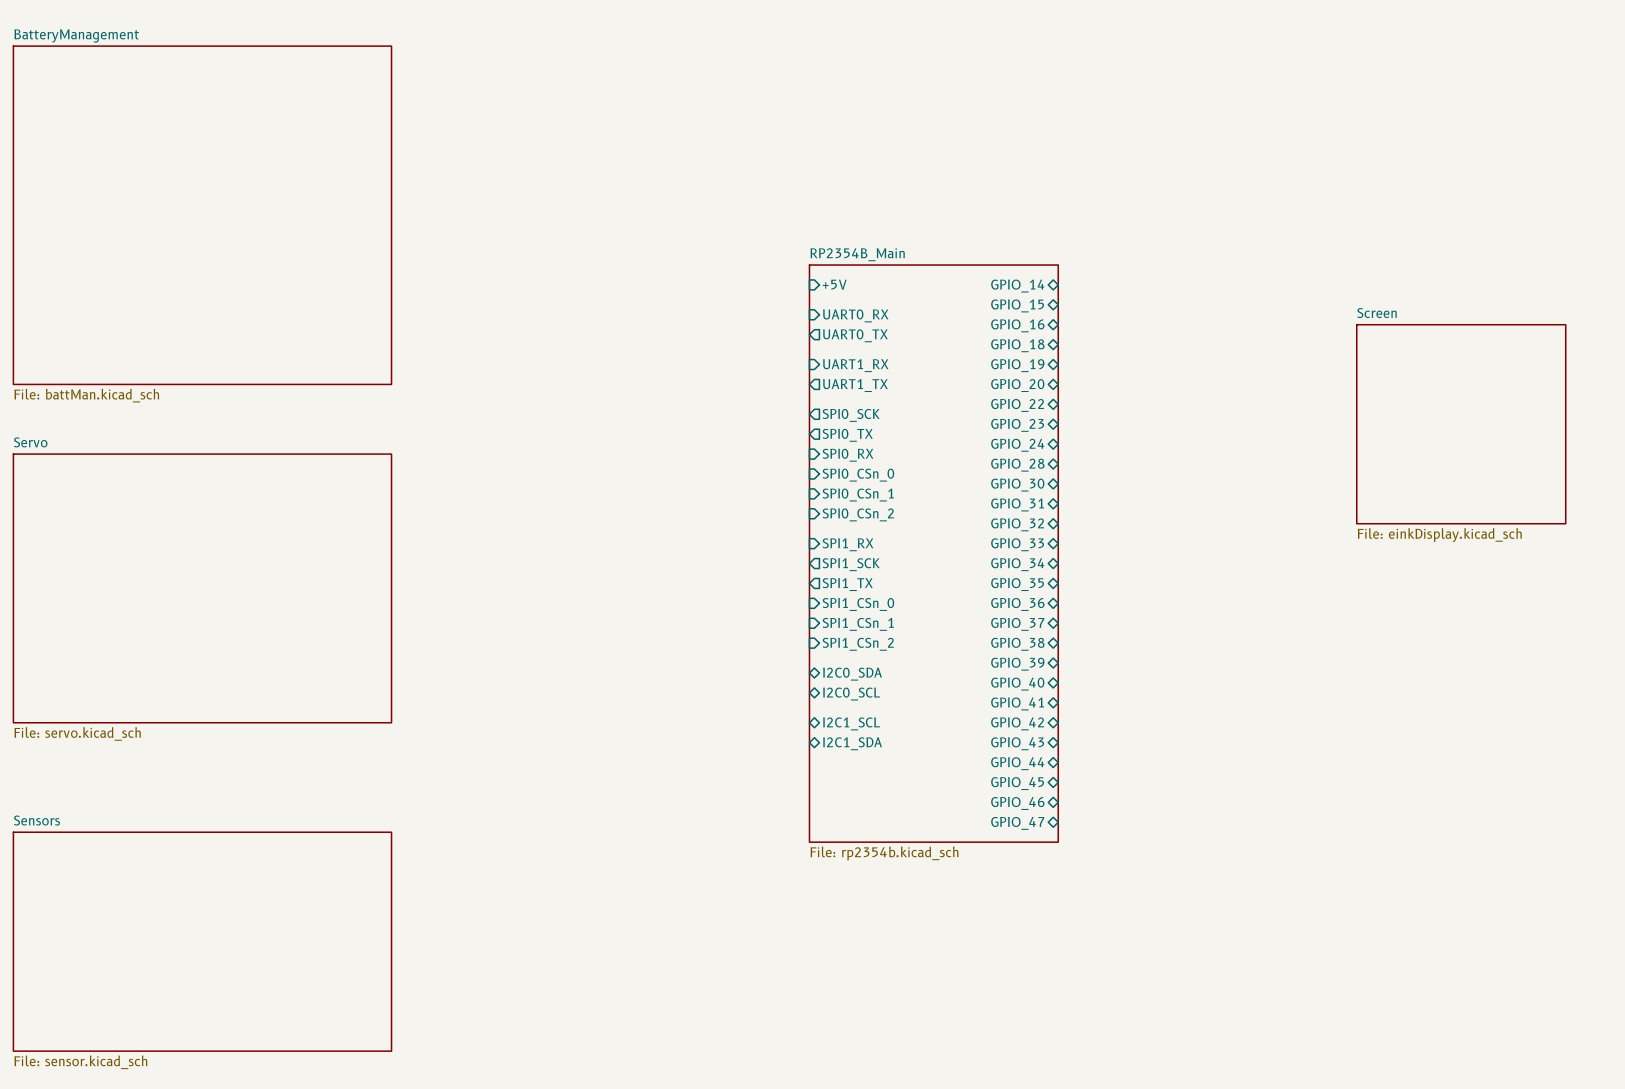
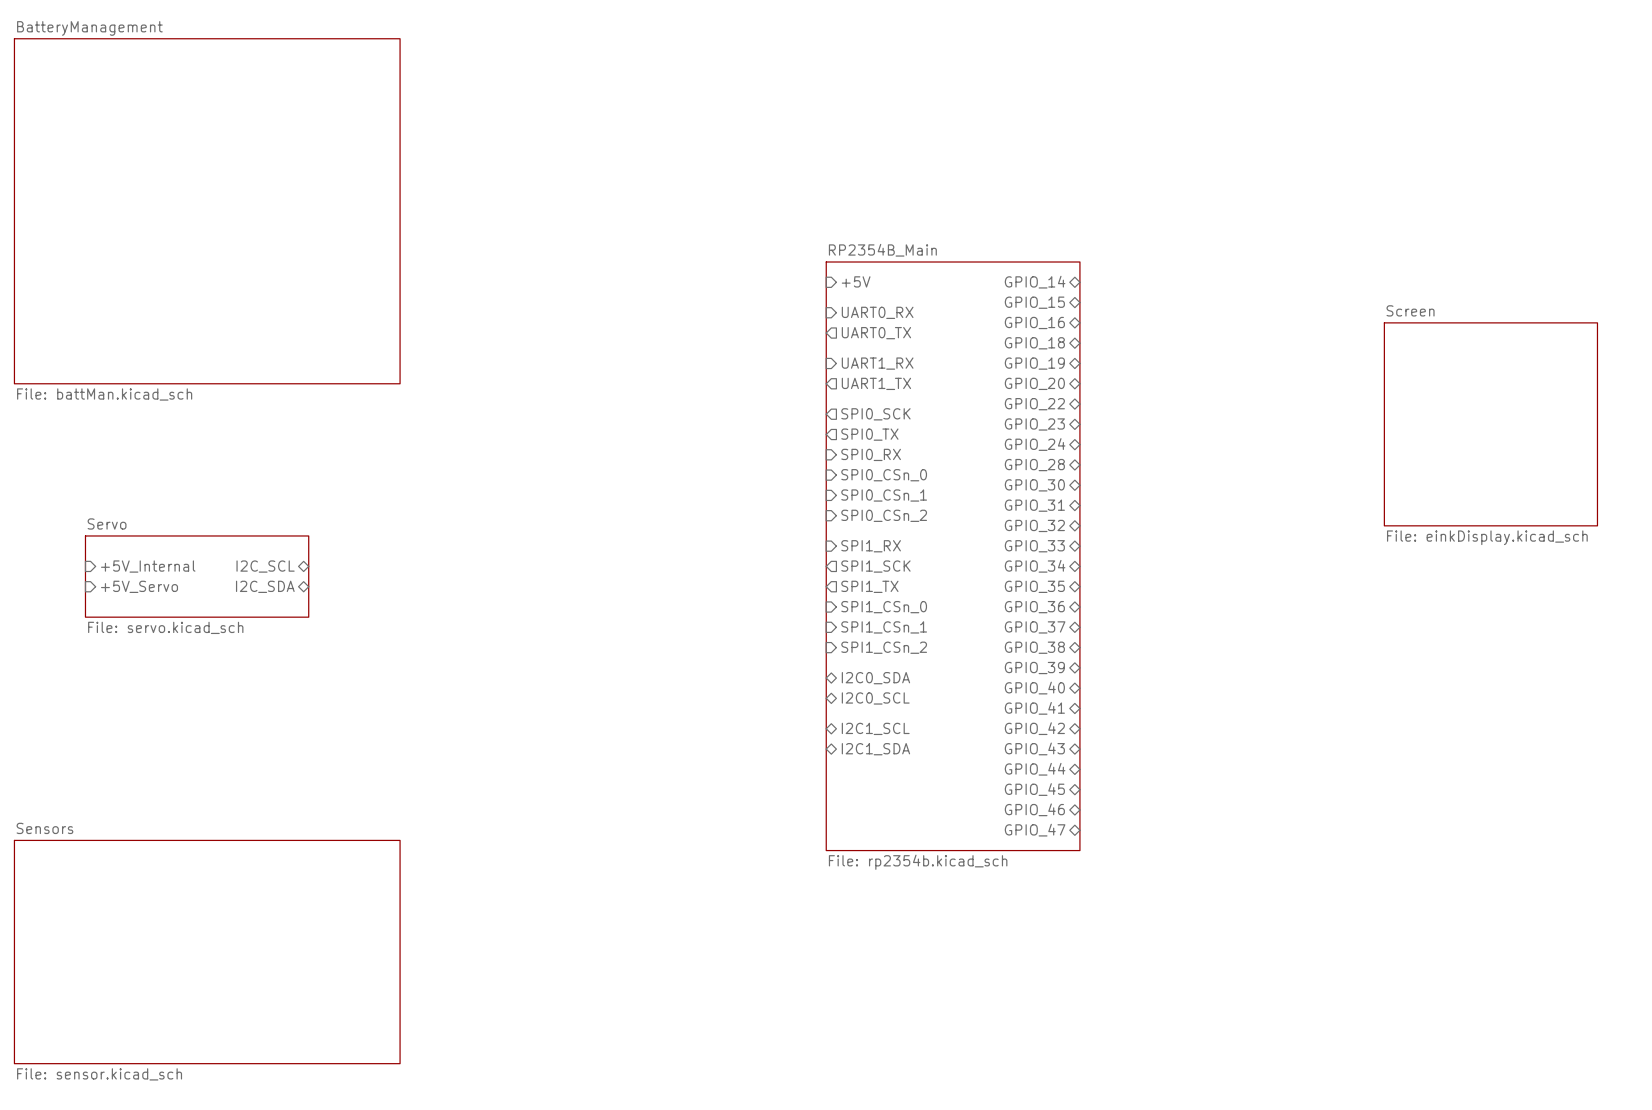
sheet pin: none -> +5V_Internal (148, 566)
sheet pin: none -> I2C_SCL (265, 566)
sheet Servo: none -> File: servo.kicad_sch (197, 576)
sheet pin: none -> +5V_Servo (139, 586)
sheet pin: none -> I2C_SDA (265, 586)
sheet Servo: File: servo.kicad_sch (202, 588) -> none

